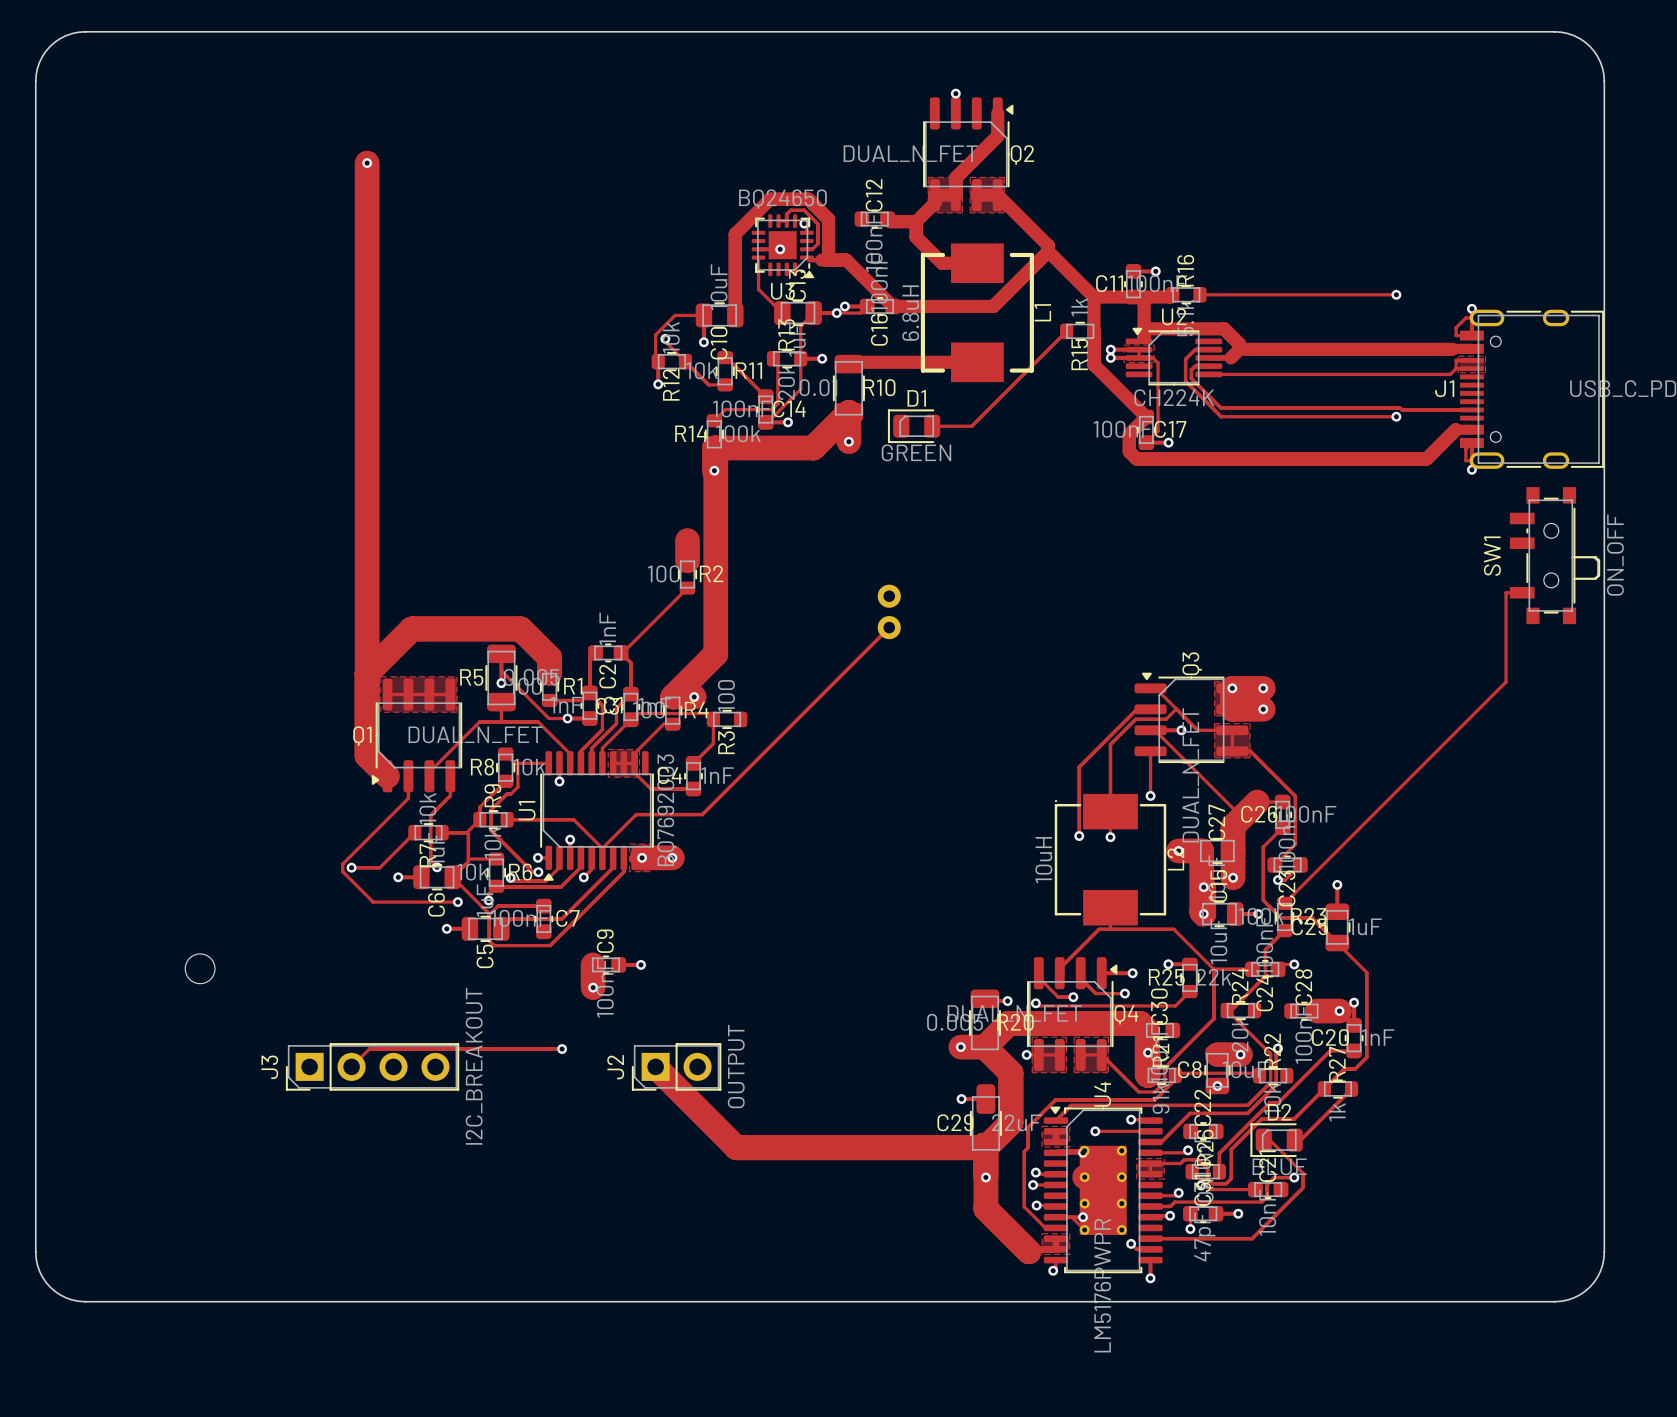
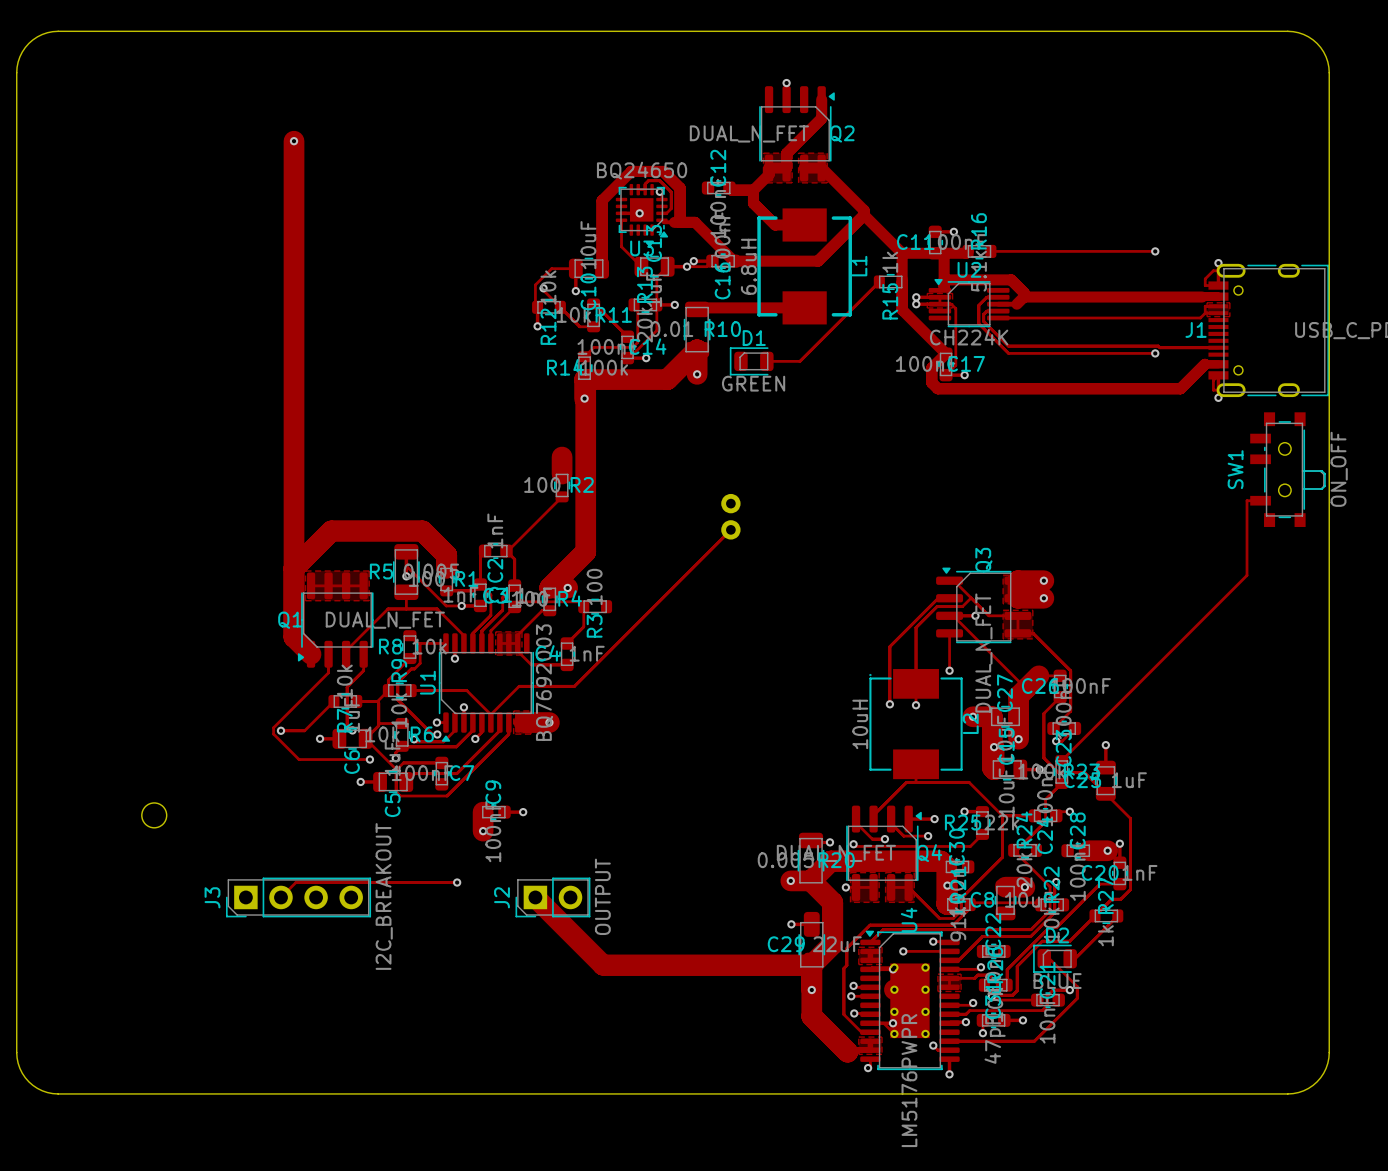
via: (1232, 688) -> none
via: (642, 857) -> none
via: (1203, 914) -> none
via: (1217, 1086) -> none

